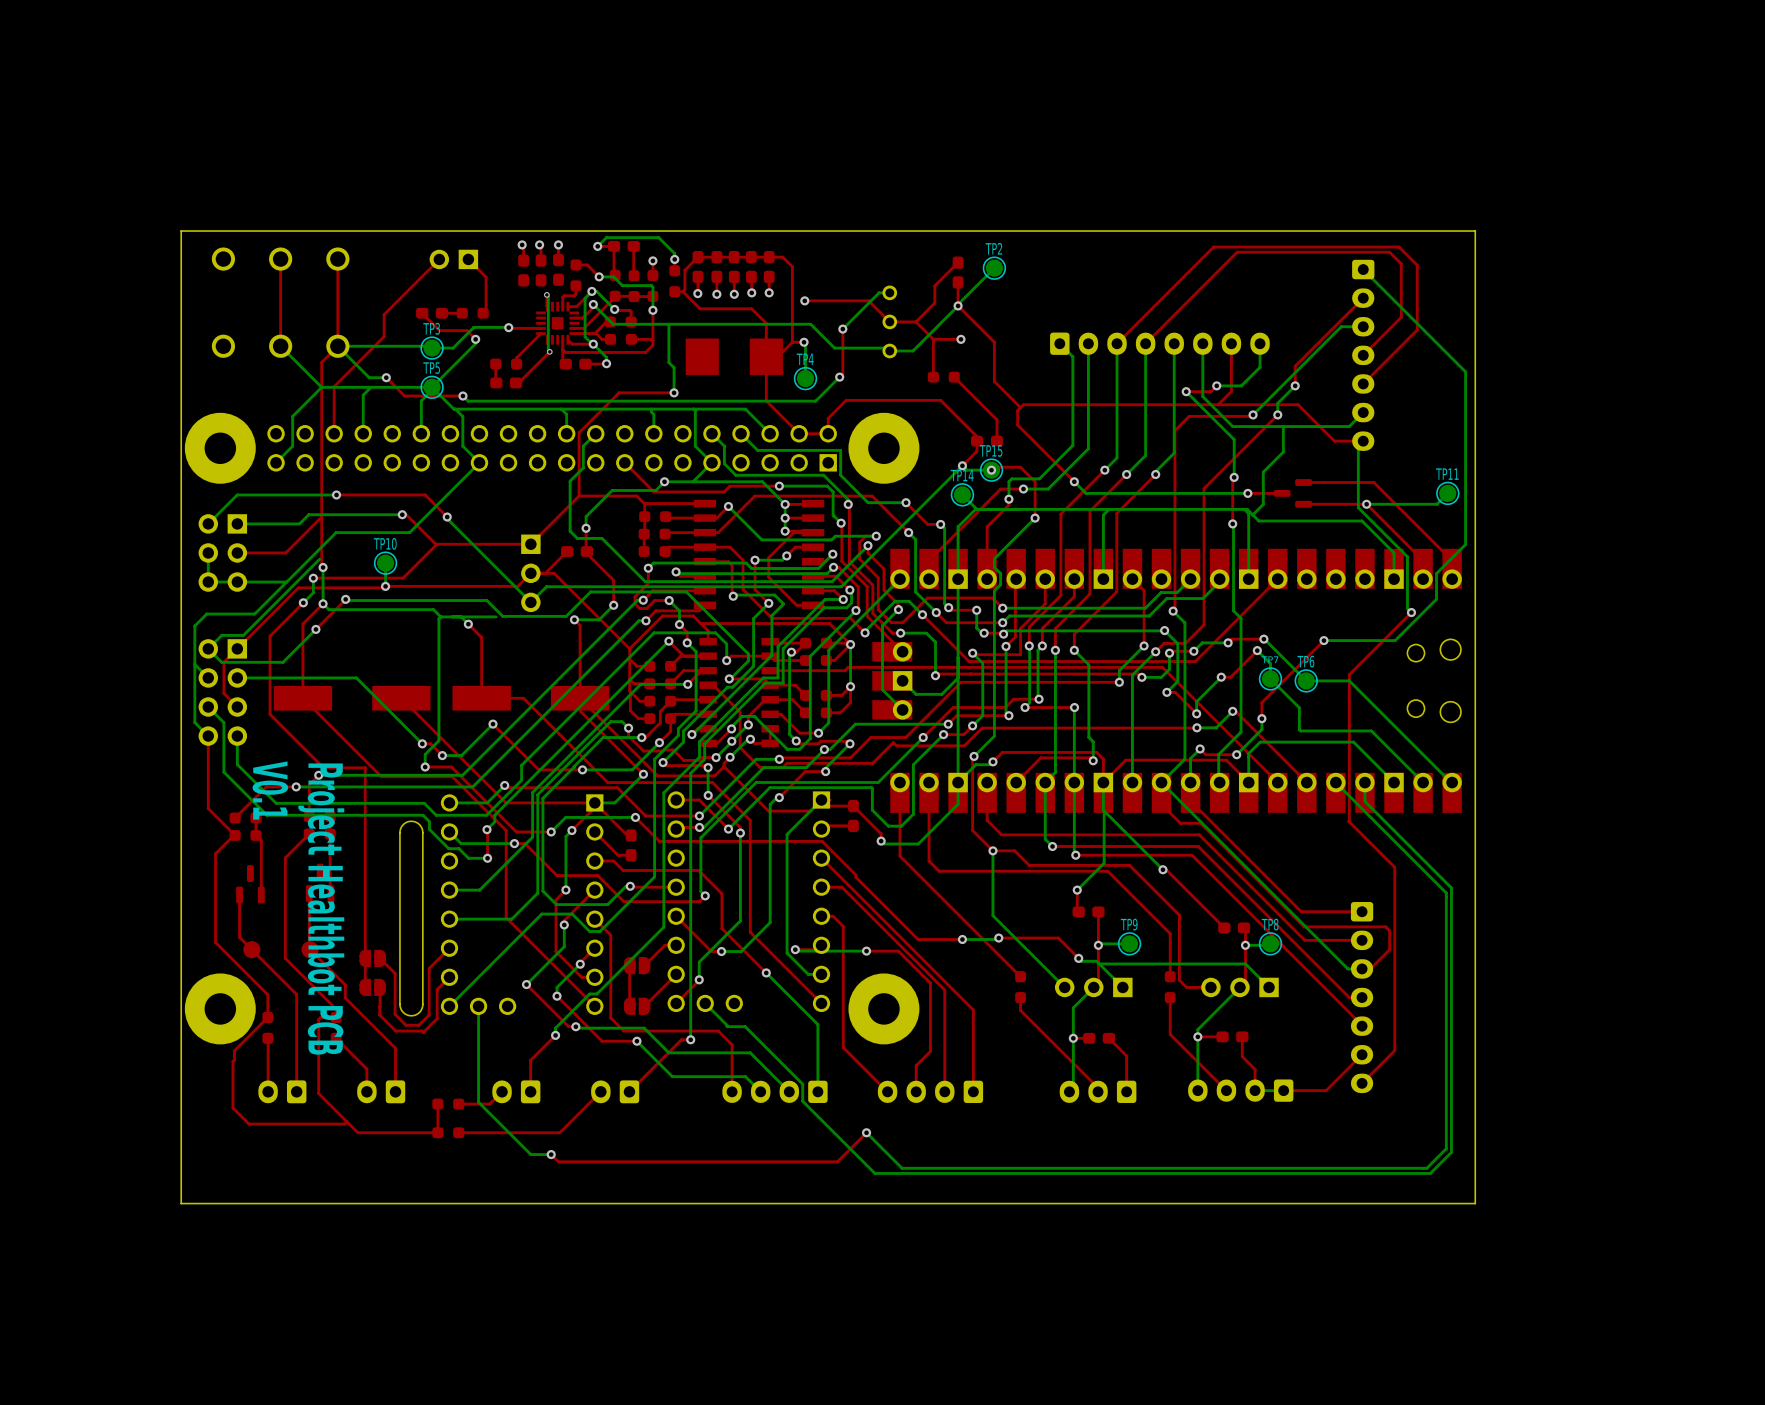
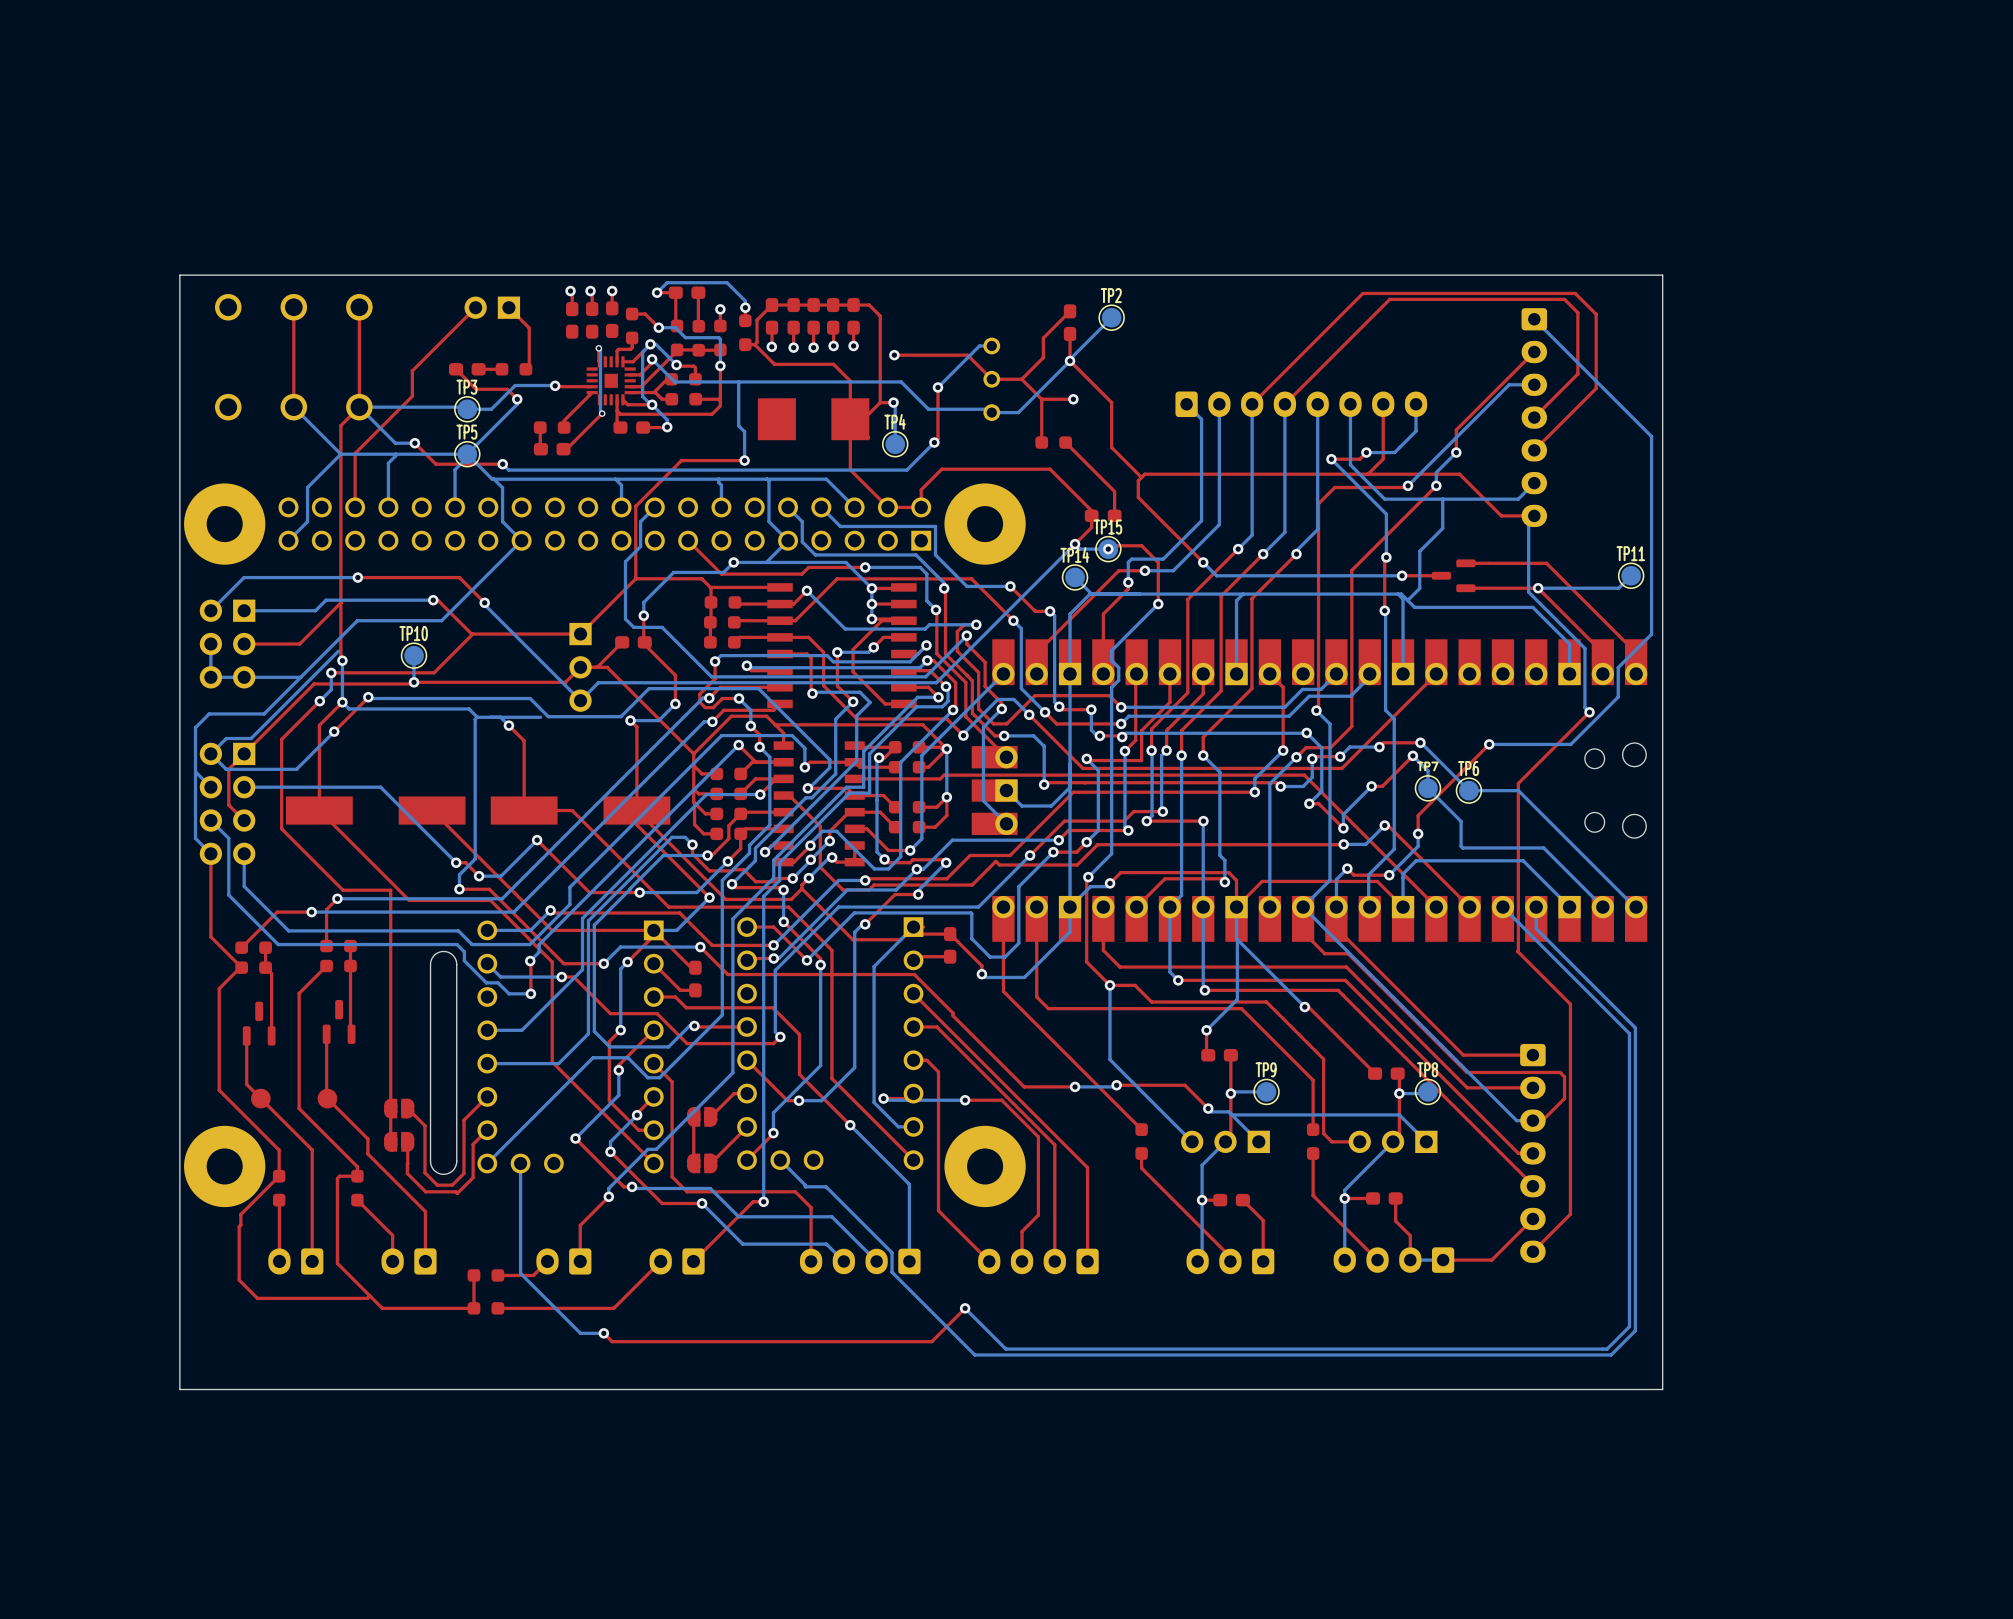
text: V0.1 (270, 790) -> none
text: Project Healthbot PCB (321, 909) -> none

